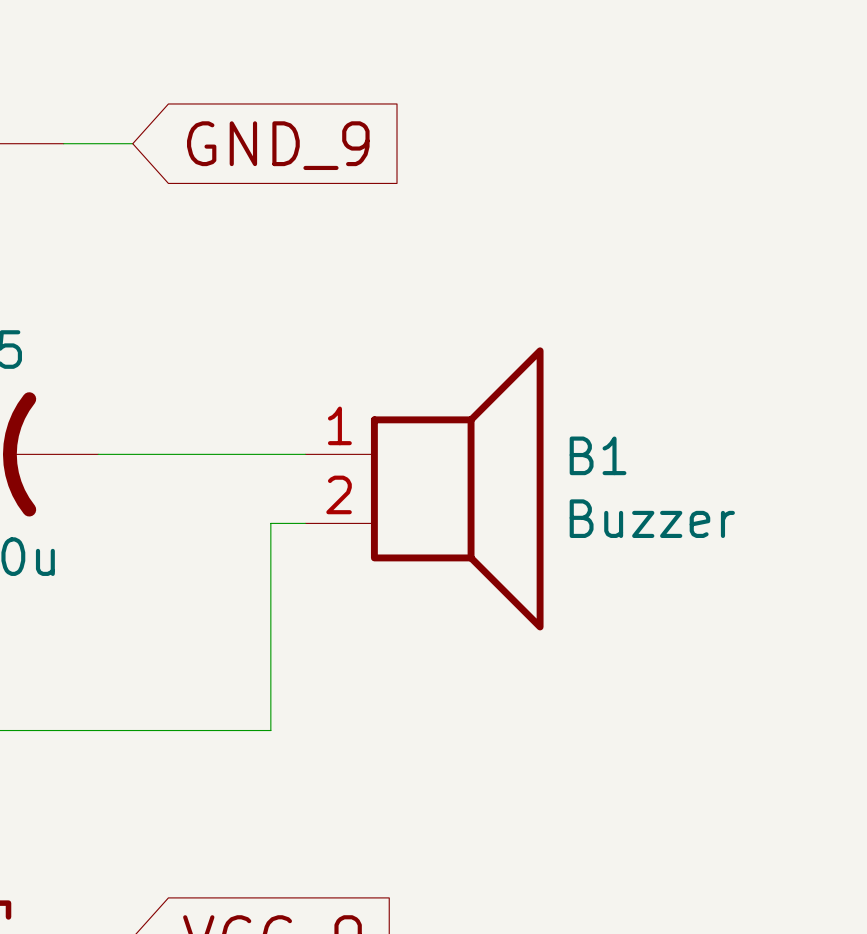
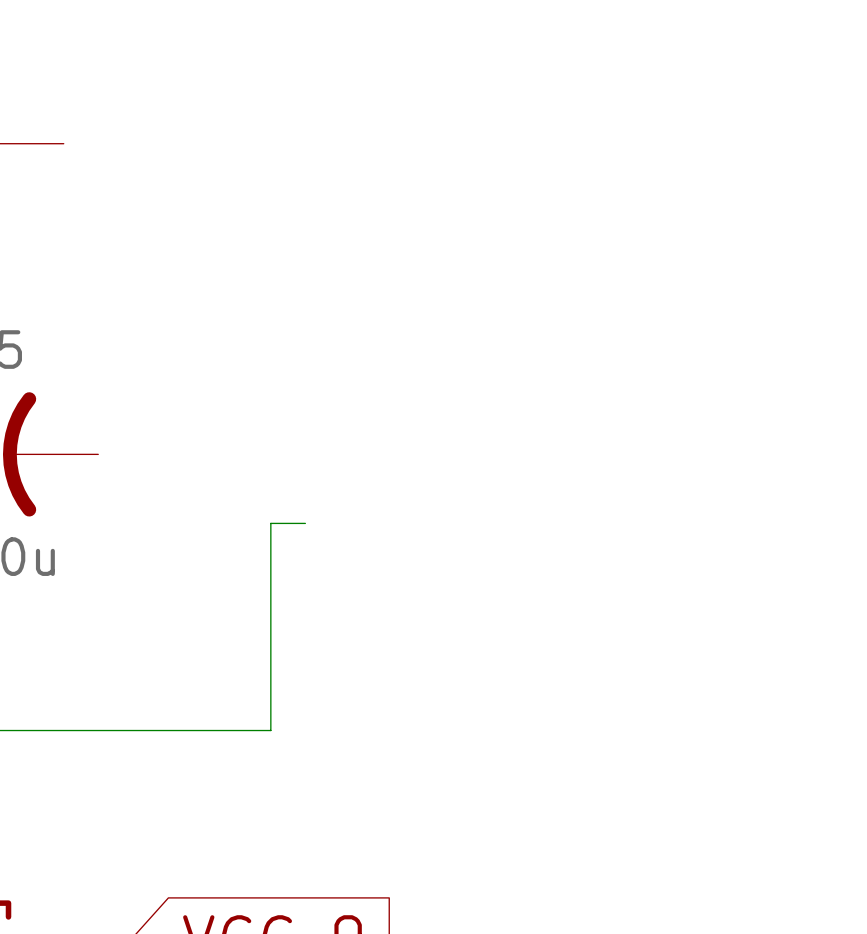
wire: (63, 143) (132, 143) -> none
global label: GND_9 (278, 145) -> none
wire: (98, 454) (305, 454) -> none
B1: Buzzer (424, 488) -> none

